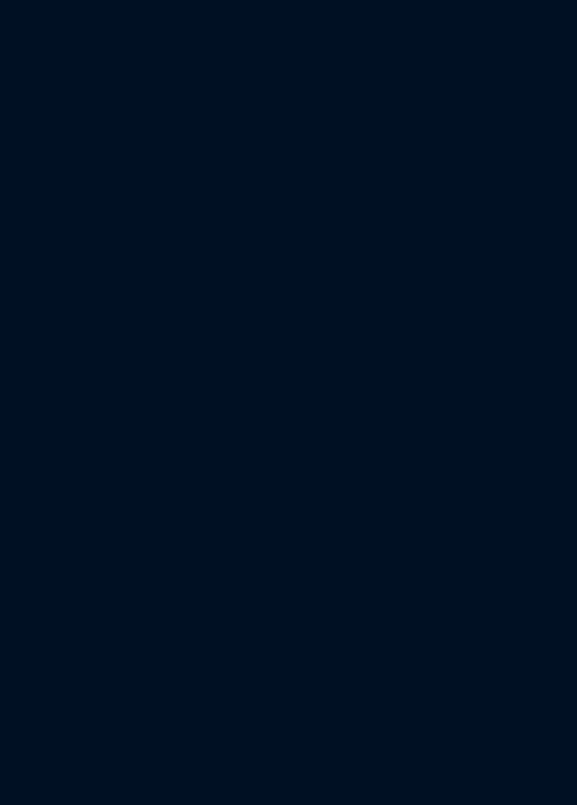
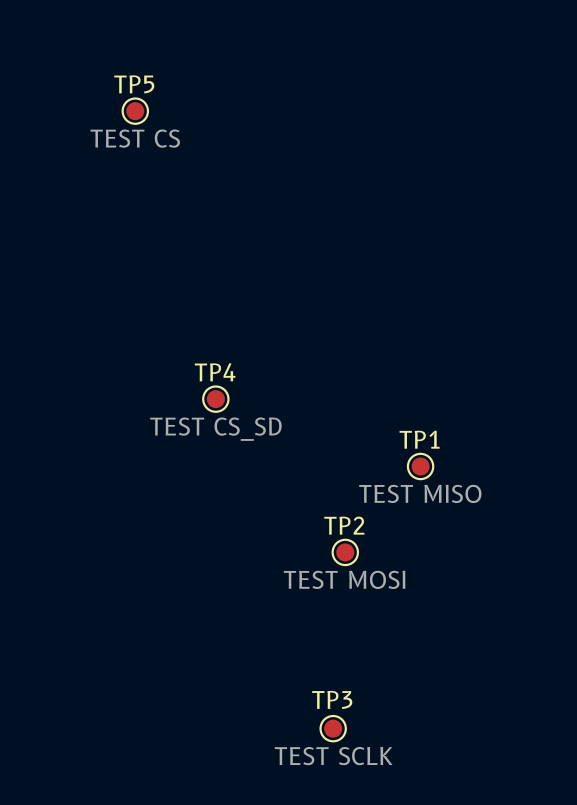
TP5: none -> TEST CS (135, 111)
TP4: none -> TEST CS_SD (215, 399)
TP1: none -> TEST MISO (420, 466)
TP2: none -> TEST MOSI (345, 552)
TP3: none -> TEST SCLK (333, 728)

